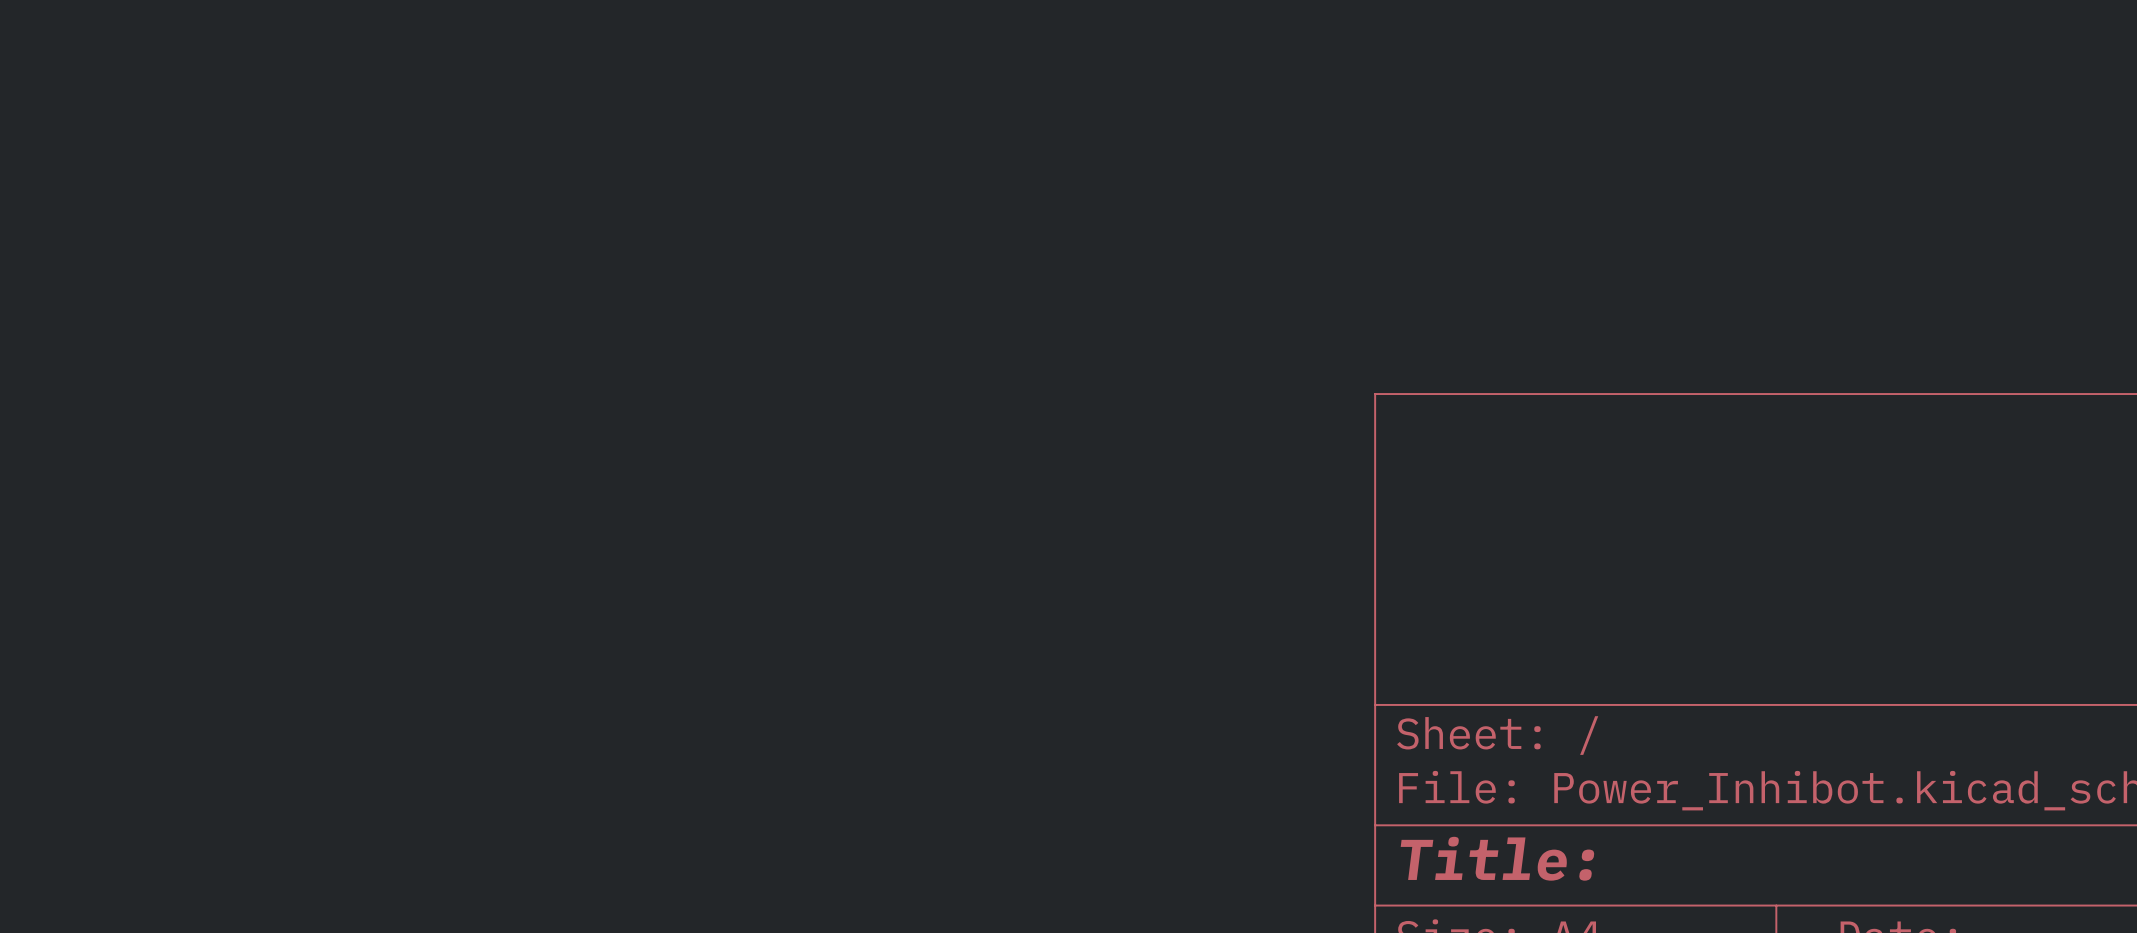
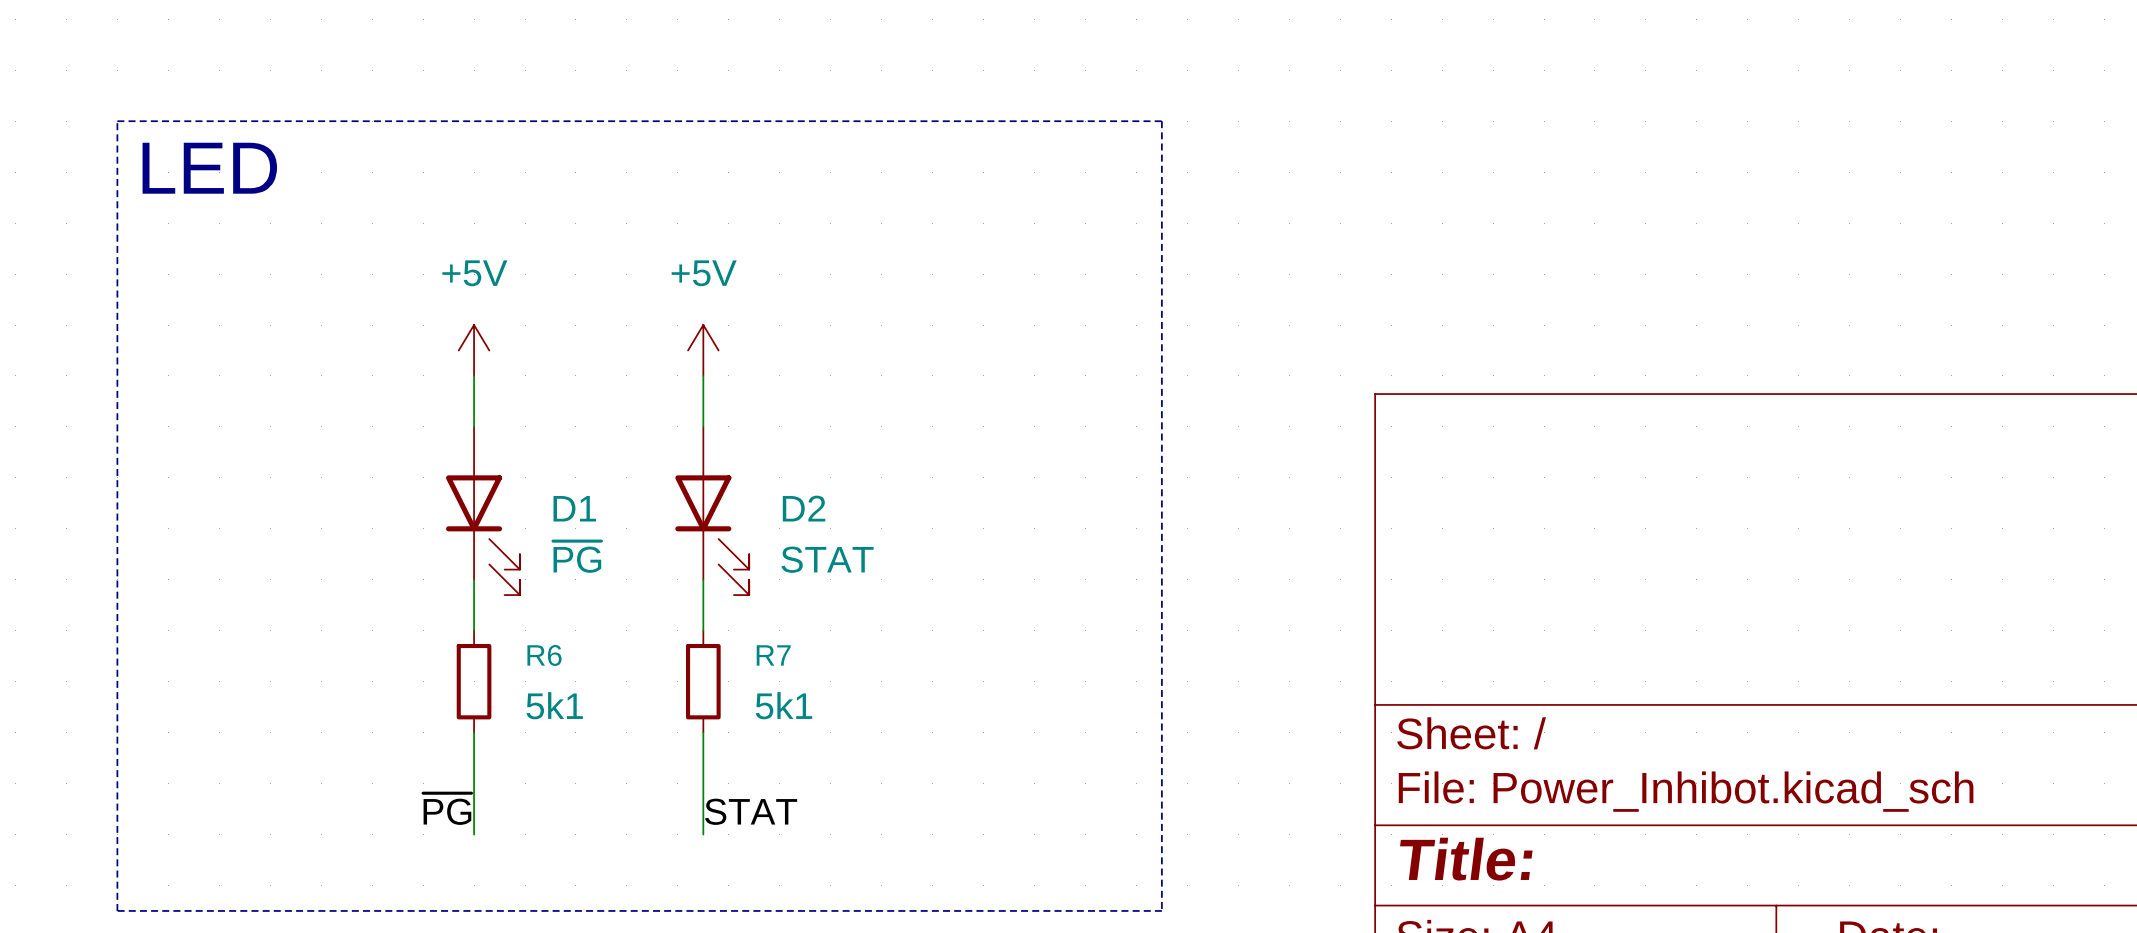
line: none -> (117, 121) (1161, 121) (1161, 910) (117, 910) (117, 121)
text: none -> LED (209, 168)
power symbol: none -> +5V (474, 350)
power symbol: none -> +5V (703, 350)
wire: none -> (474, 375) (474, 426)
wire: none -> (703, 375) (703, 426)
D1: none -> ~{PG} (482, 510)
D2: none -> STAT (712, 510)
wire: none -> (474, 579) (474, 630)
wire: none -> (703, 579) (703, 630)
R6: none -> 5k1 (474, 681)
R7: none -> 5k1 (703, 681)
wire: none -> (474, 732) (474, 834)
wire: none -> (703, 732) (703, 834)
label: none -> ~{PG} (447, 809)
label: none -> STAT (751, 811)

